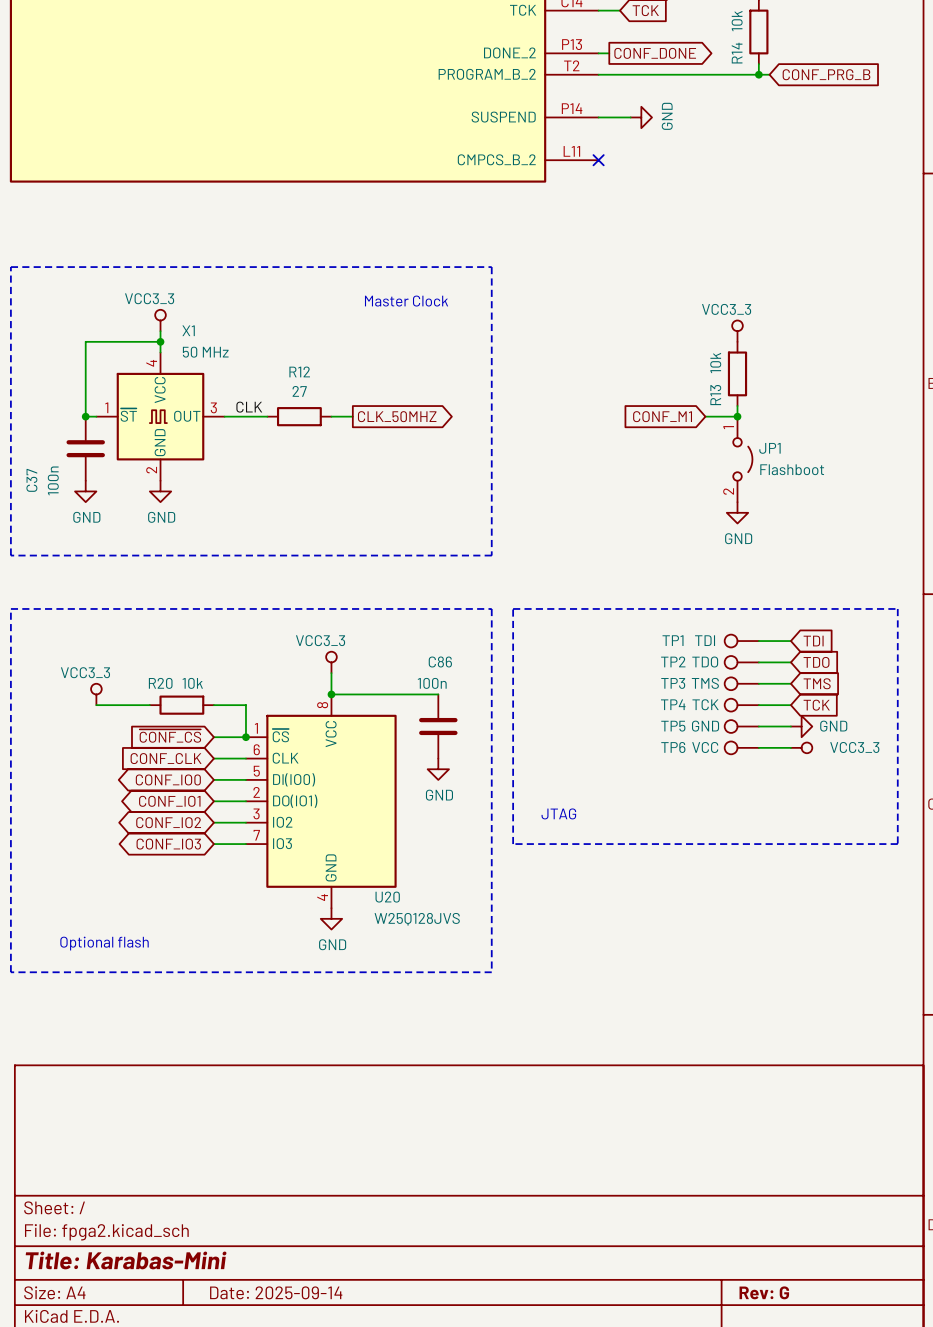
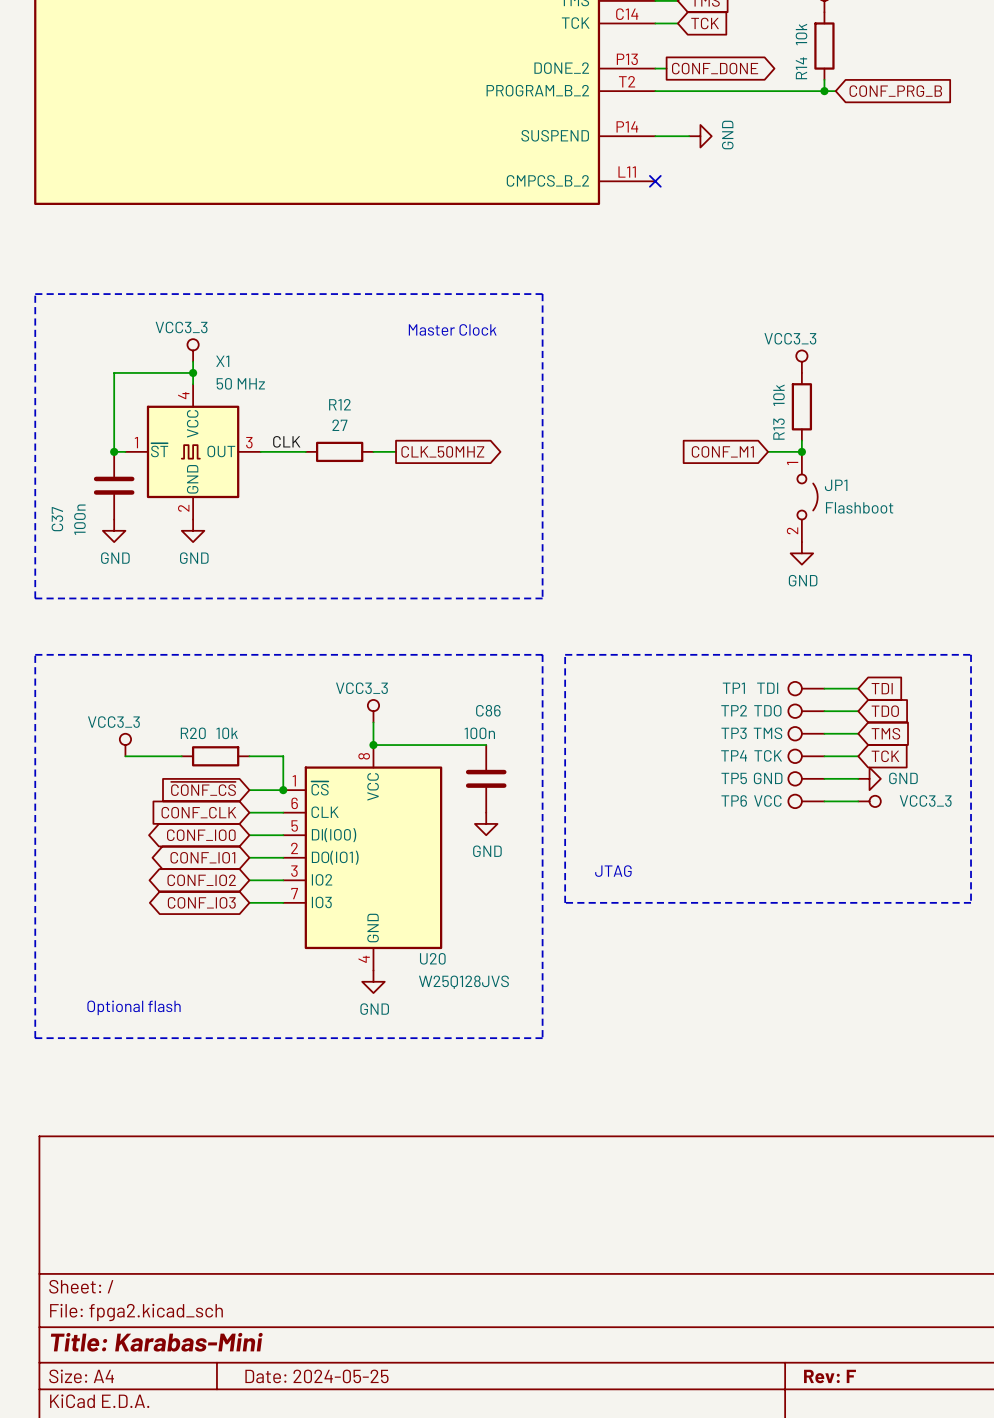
title block: Date: 2025-09-14 (276, 1292) -> Date: 2024-05-25 (316, 1376)
title block: Rev: G (764, 1292) -> Rev: F (829, 1376)

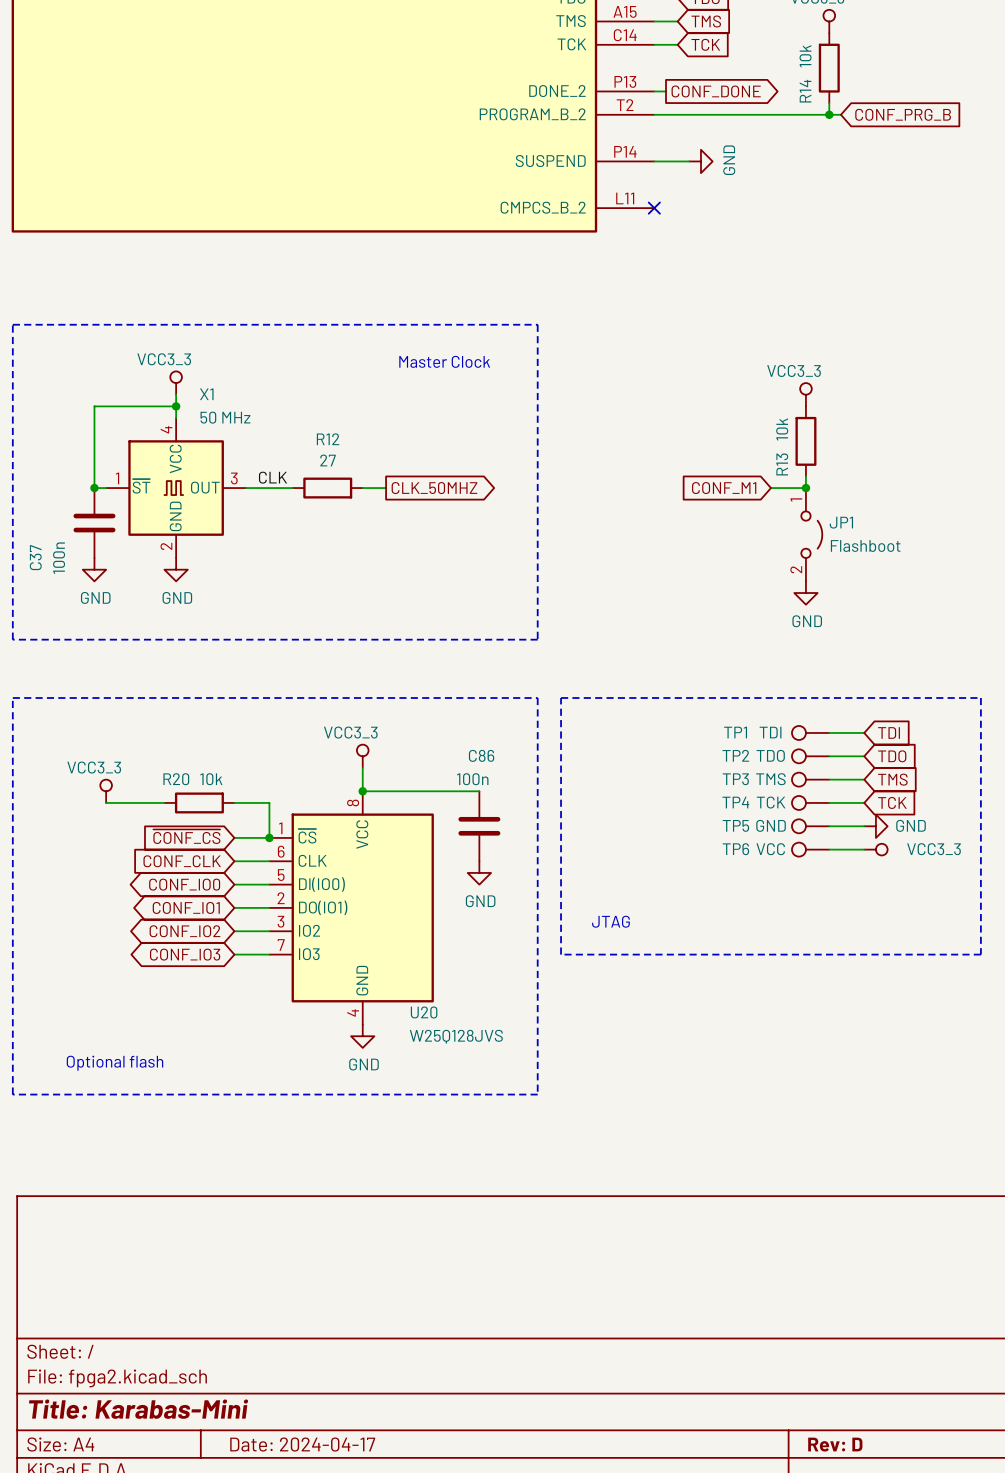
title block: Date: 2024-05-25 (316, 1376) -> Date: 2024-04-17 (302, 1444)
title block: Rev: F (829, 1376) -> Rev: D (835, 1444)

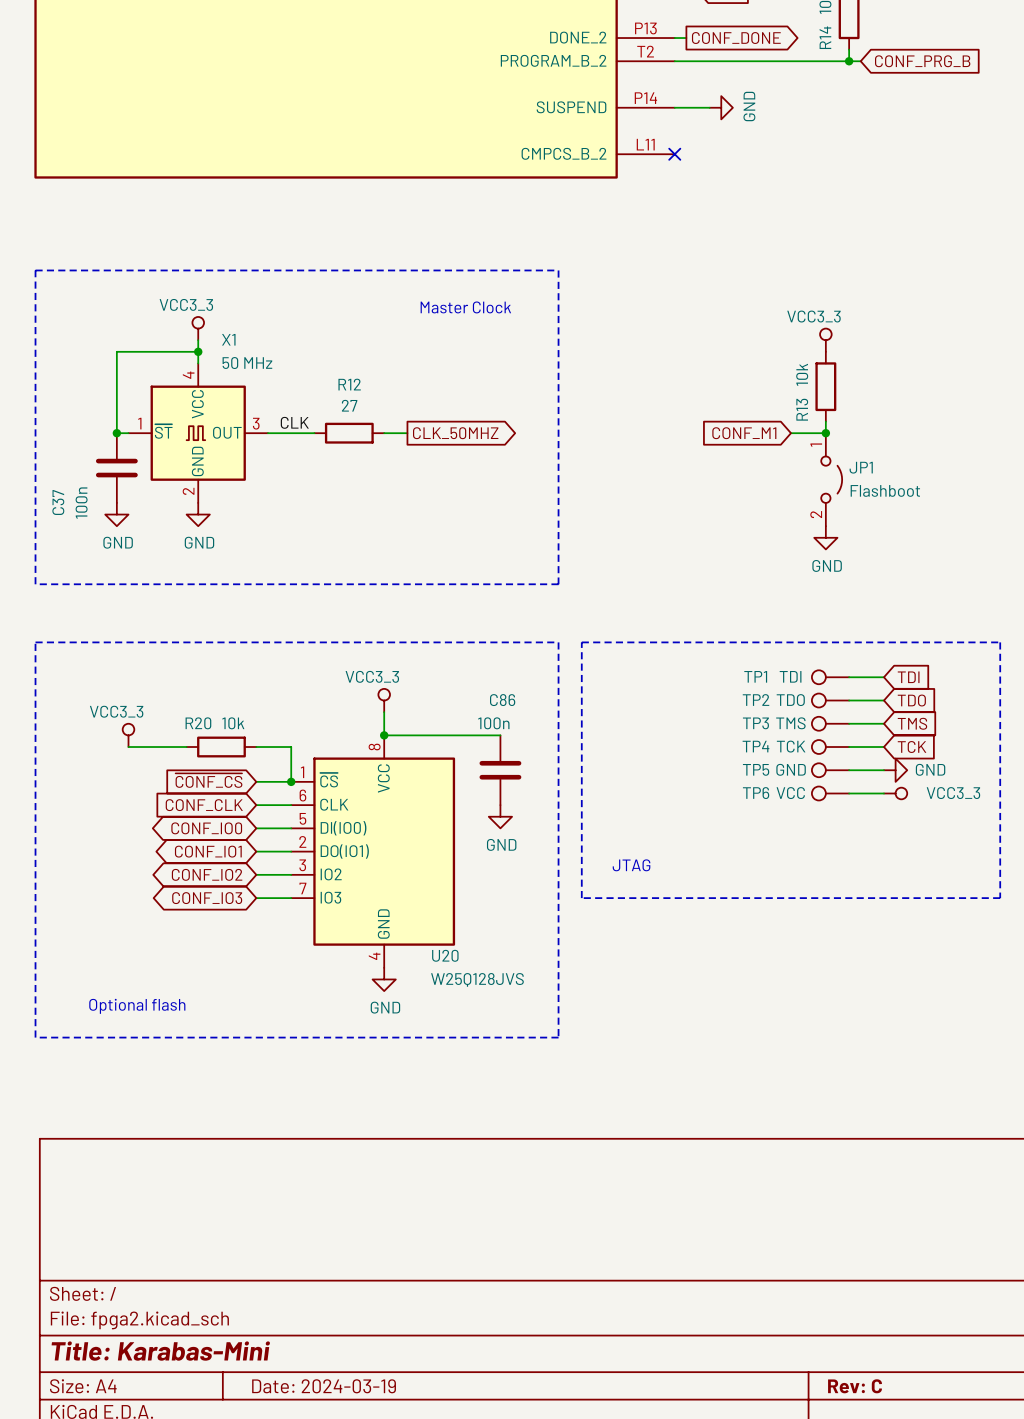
title block: Date: 2024-04-17 (302, 1444) -> Date: 2024-03-19 (324, 1386)
title block: Rev: D (835, 1444) -> Rev: C (855, 1386)

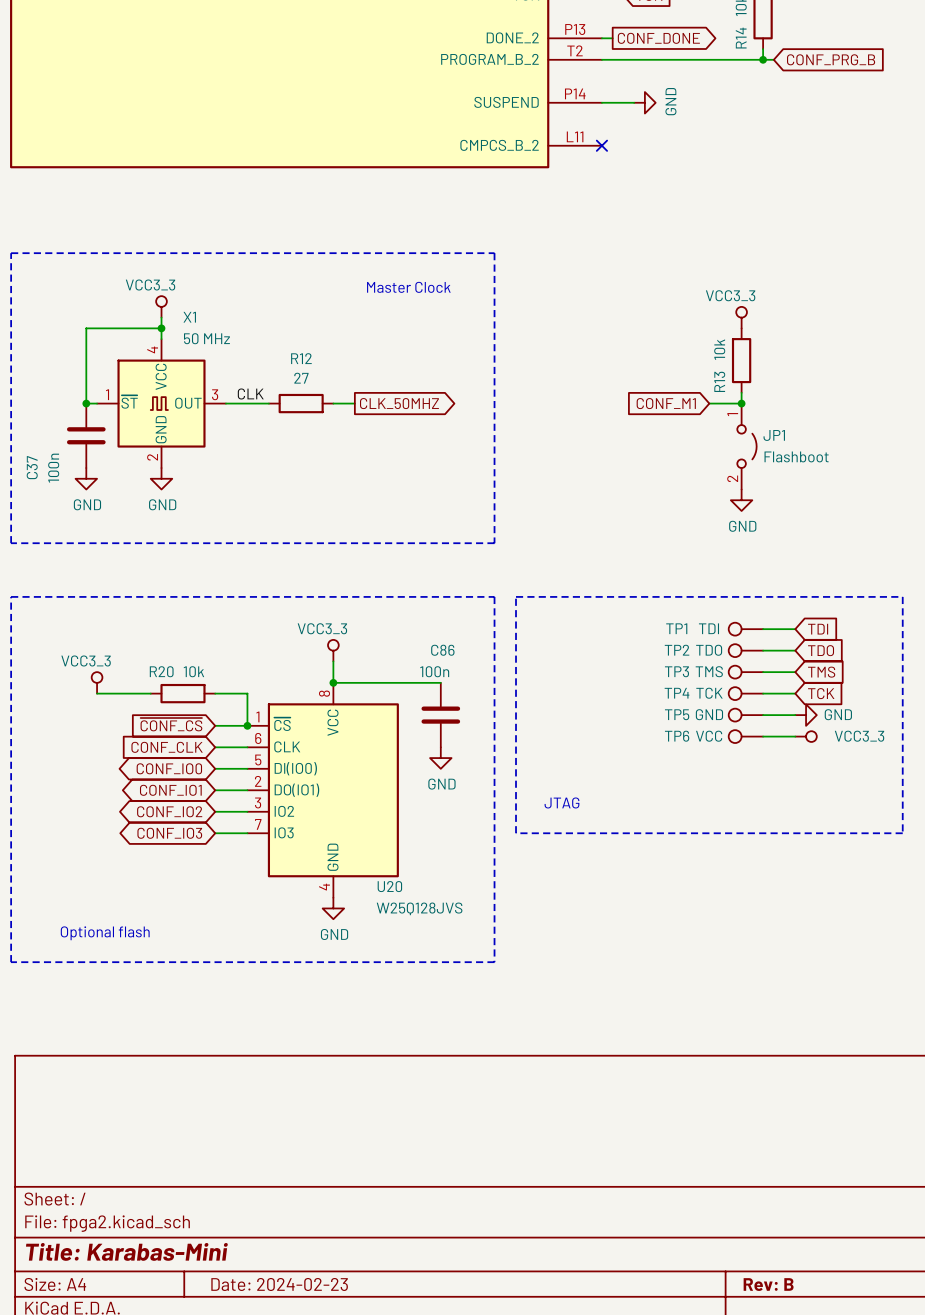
title block: Date: 2024-03-19 (324, 1386) -> Date: 2024-02-23 (279, 1284)
title block: Rev: C (855, 1386) -> Rev: B (768, 1284)

